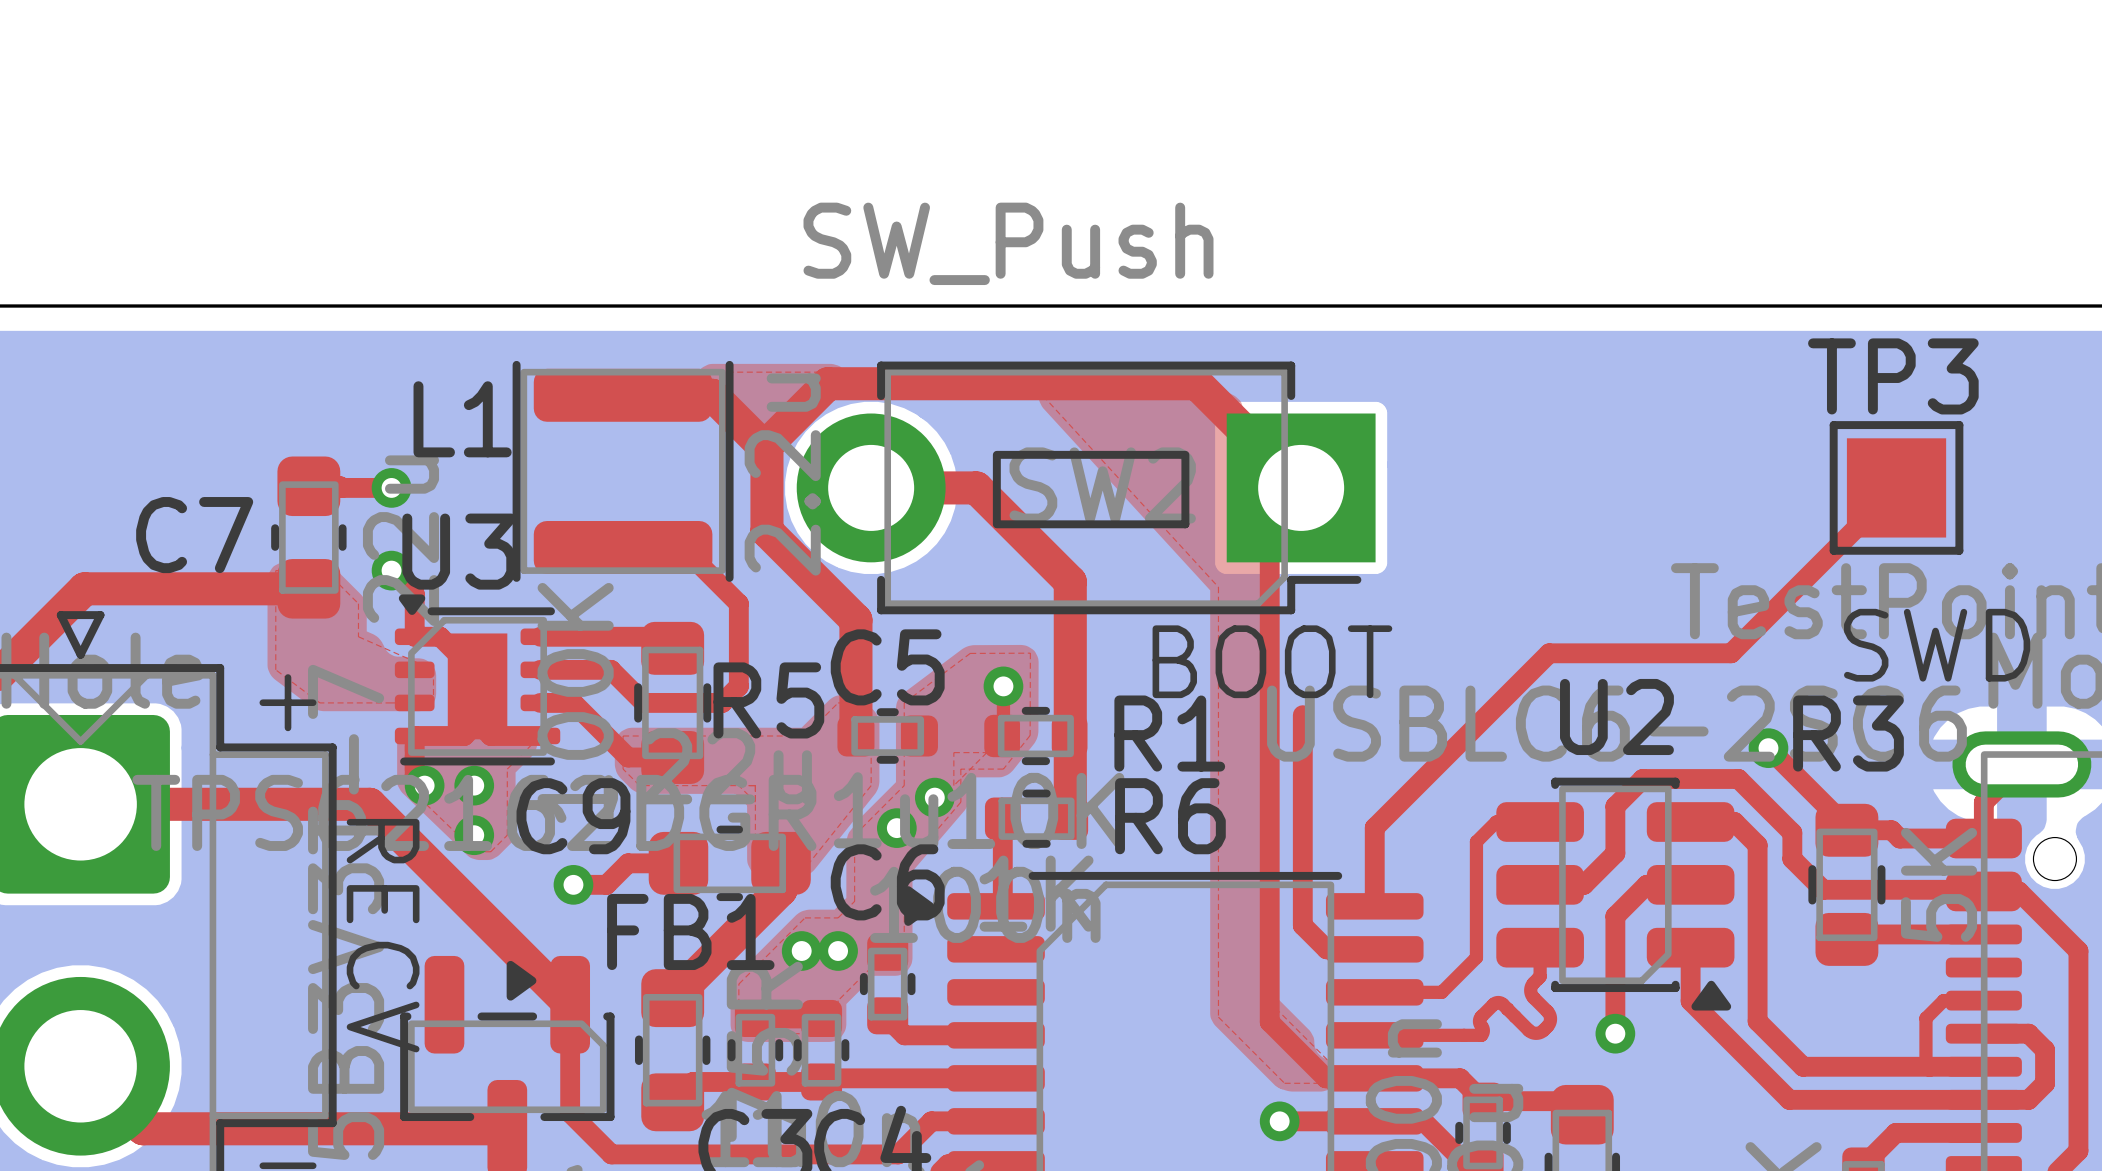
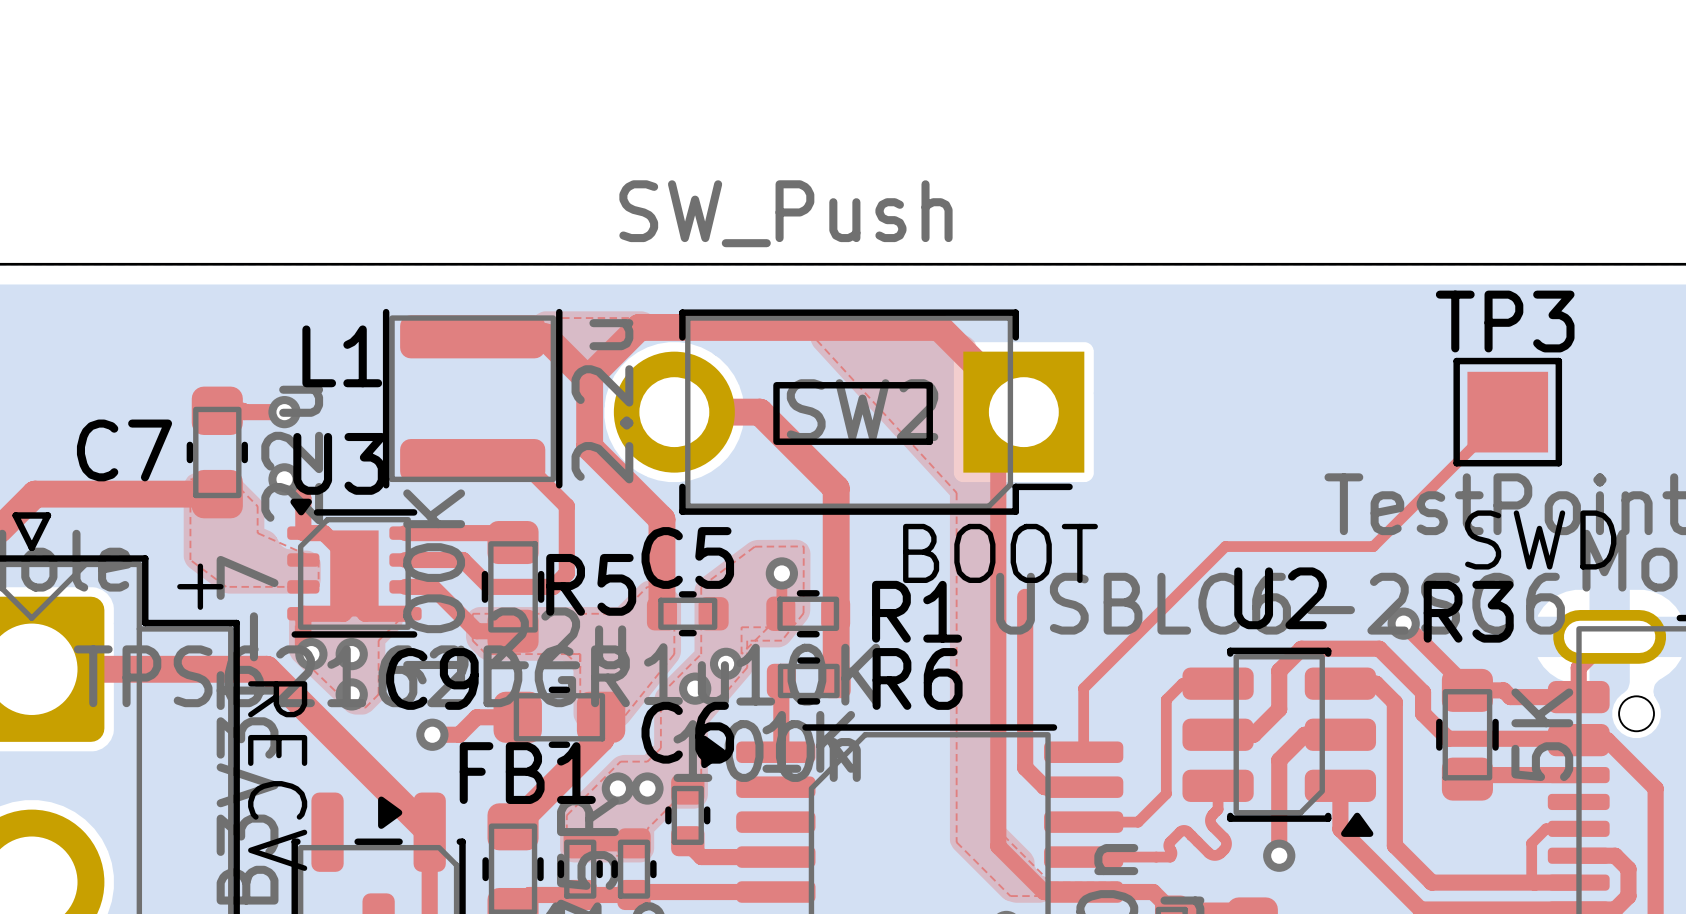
top track width: thick (1896, 487) (1731, 653) (1549, 653) (1374, 827) (1374, 906) -> thin (1507, 412) (1373, 546) (1225, 546) (1083, 688) (1083, 752)

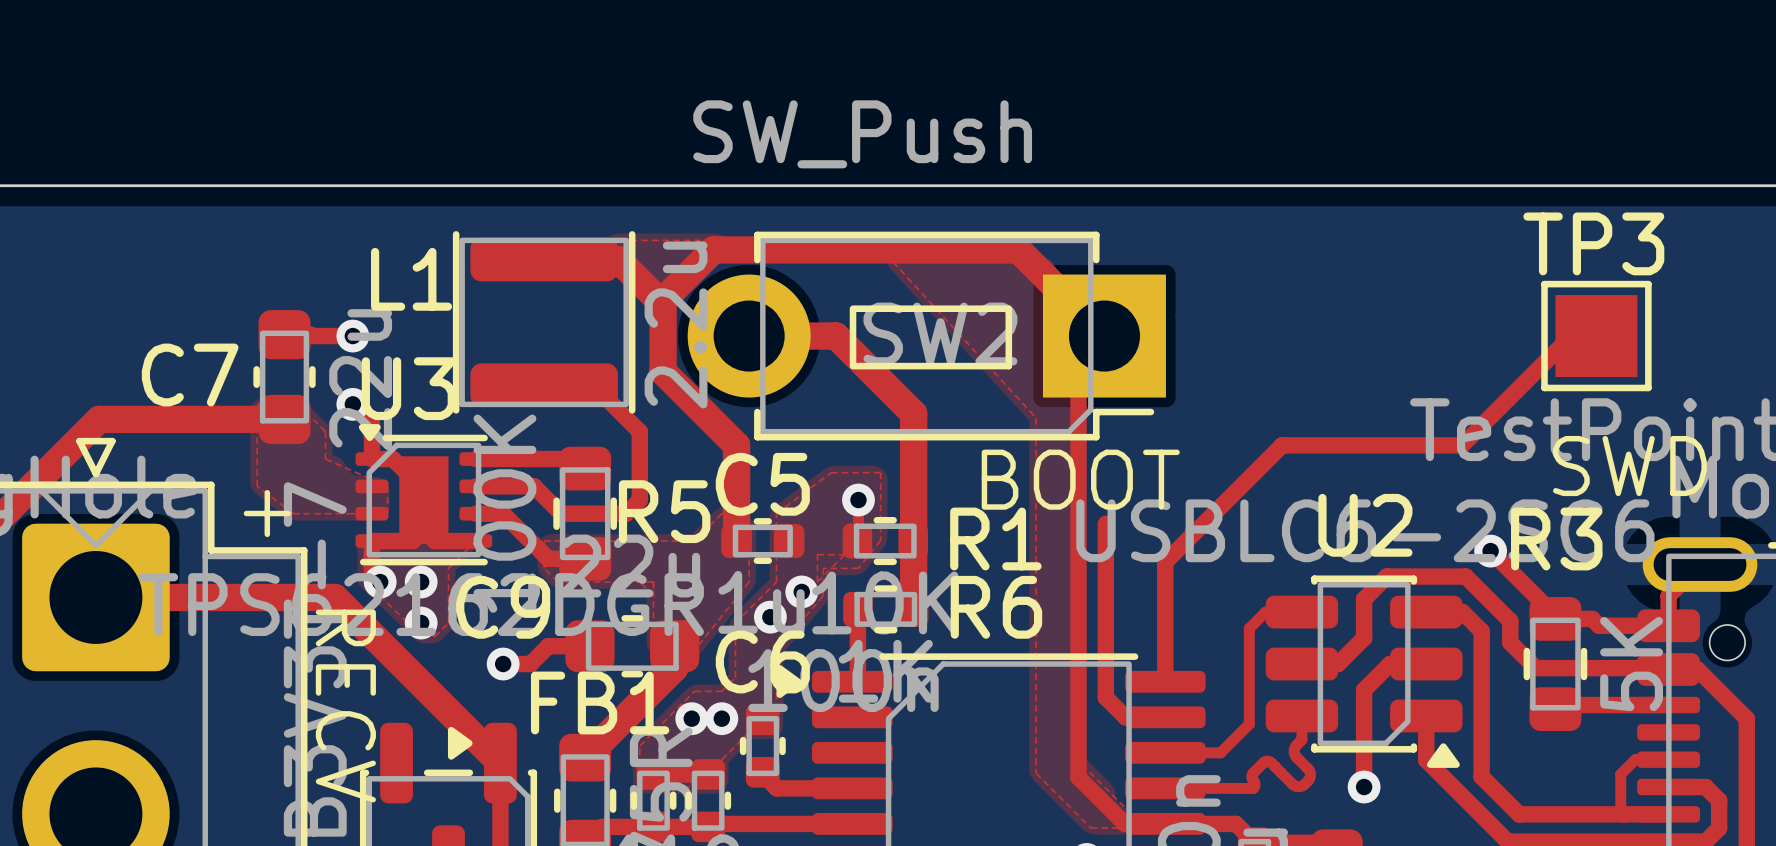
top track: (1507, 412) (1373, 546) (1225, 546) (1083, 688) -> (1598, 322) (1584, 322) (1461, 445) (1282, 445) (1165, 562) (1165, 616)
top track width: thin (1083, 688) (1083, 752) -> thick (1165, 616) (1165, 681)

